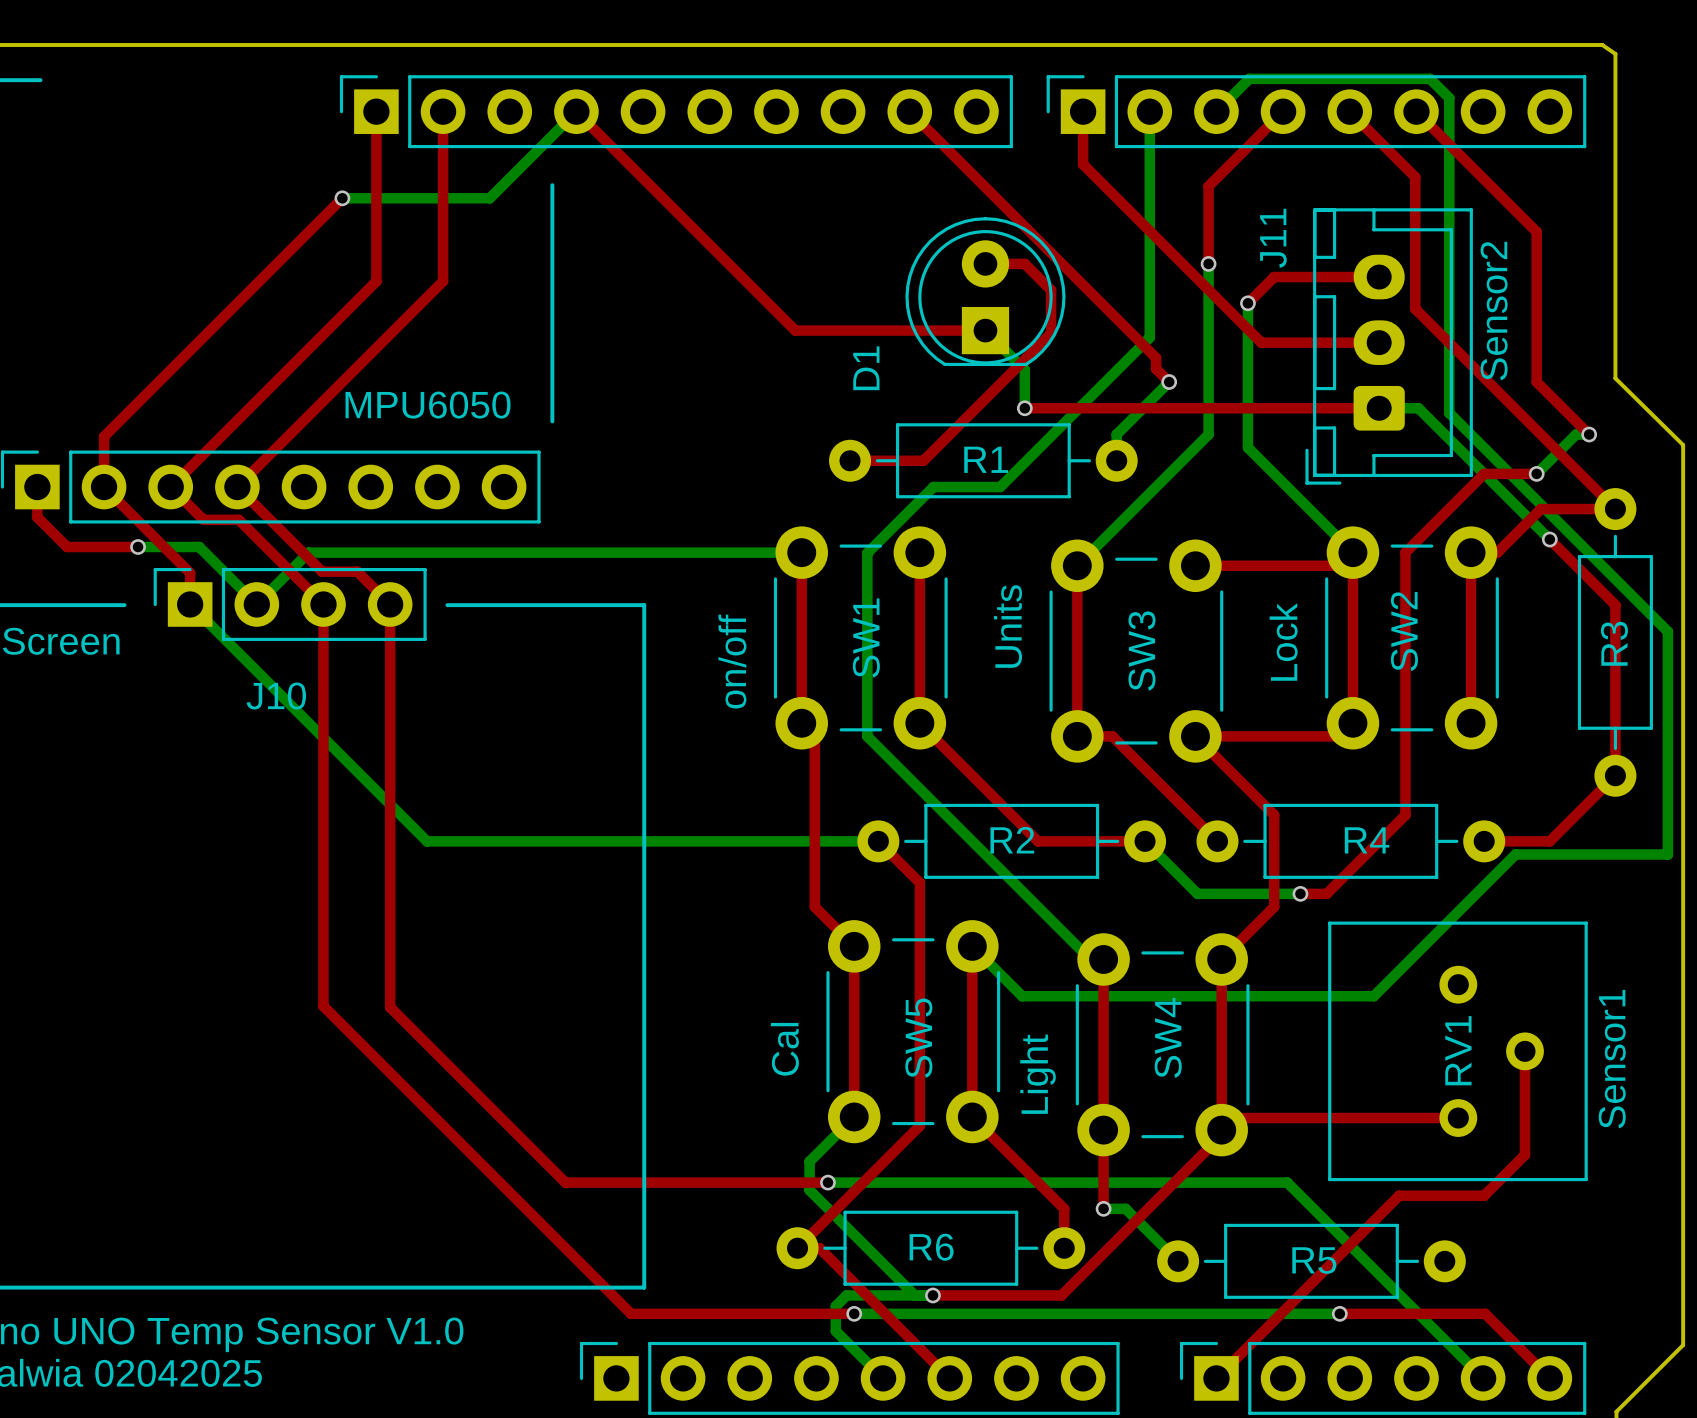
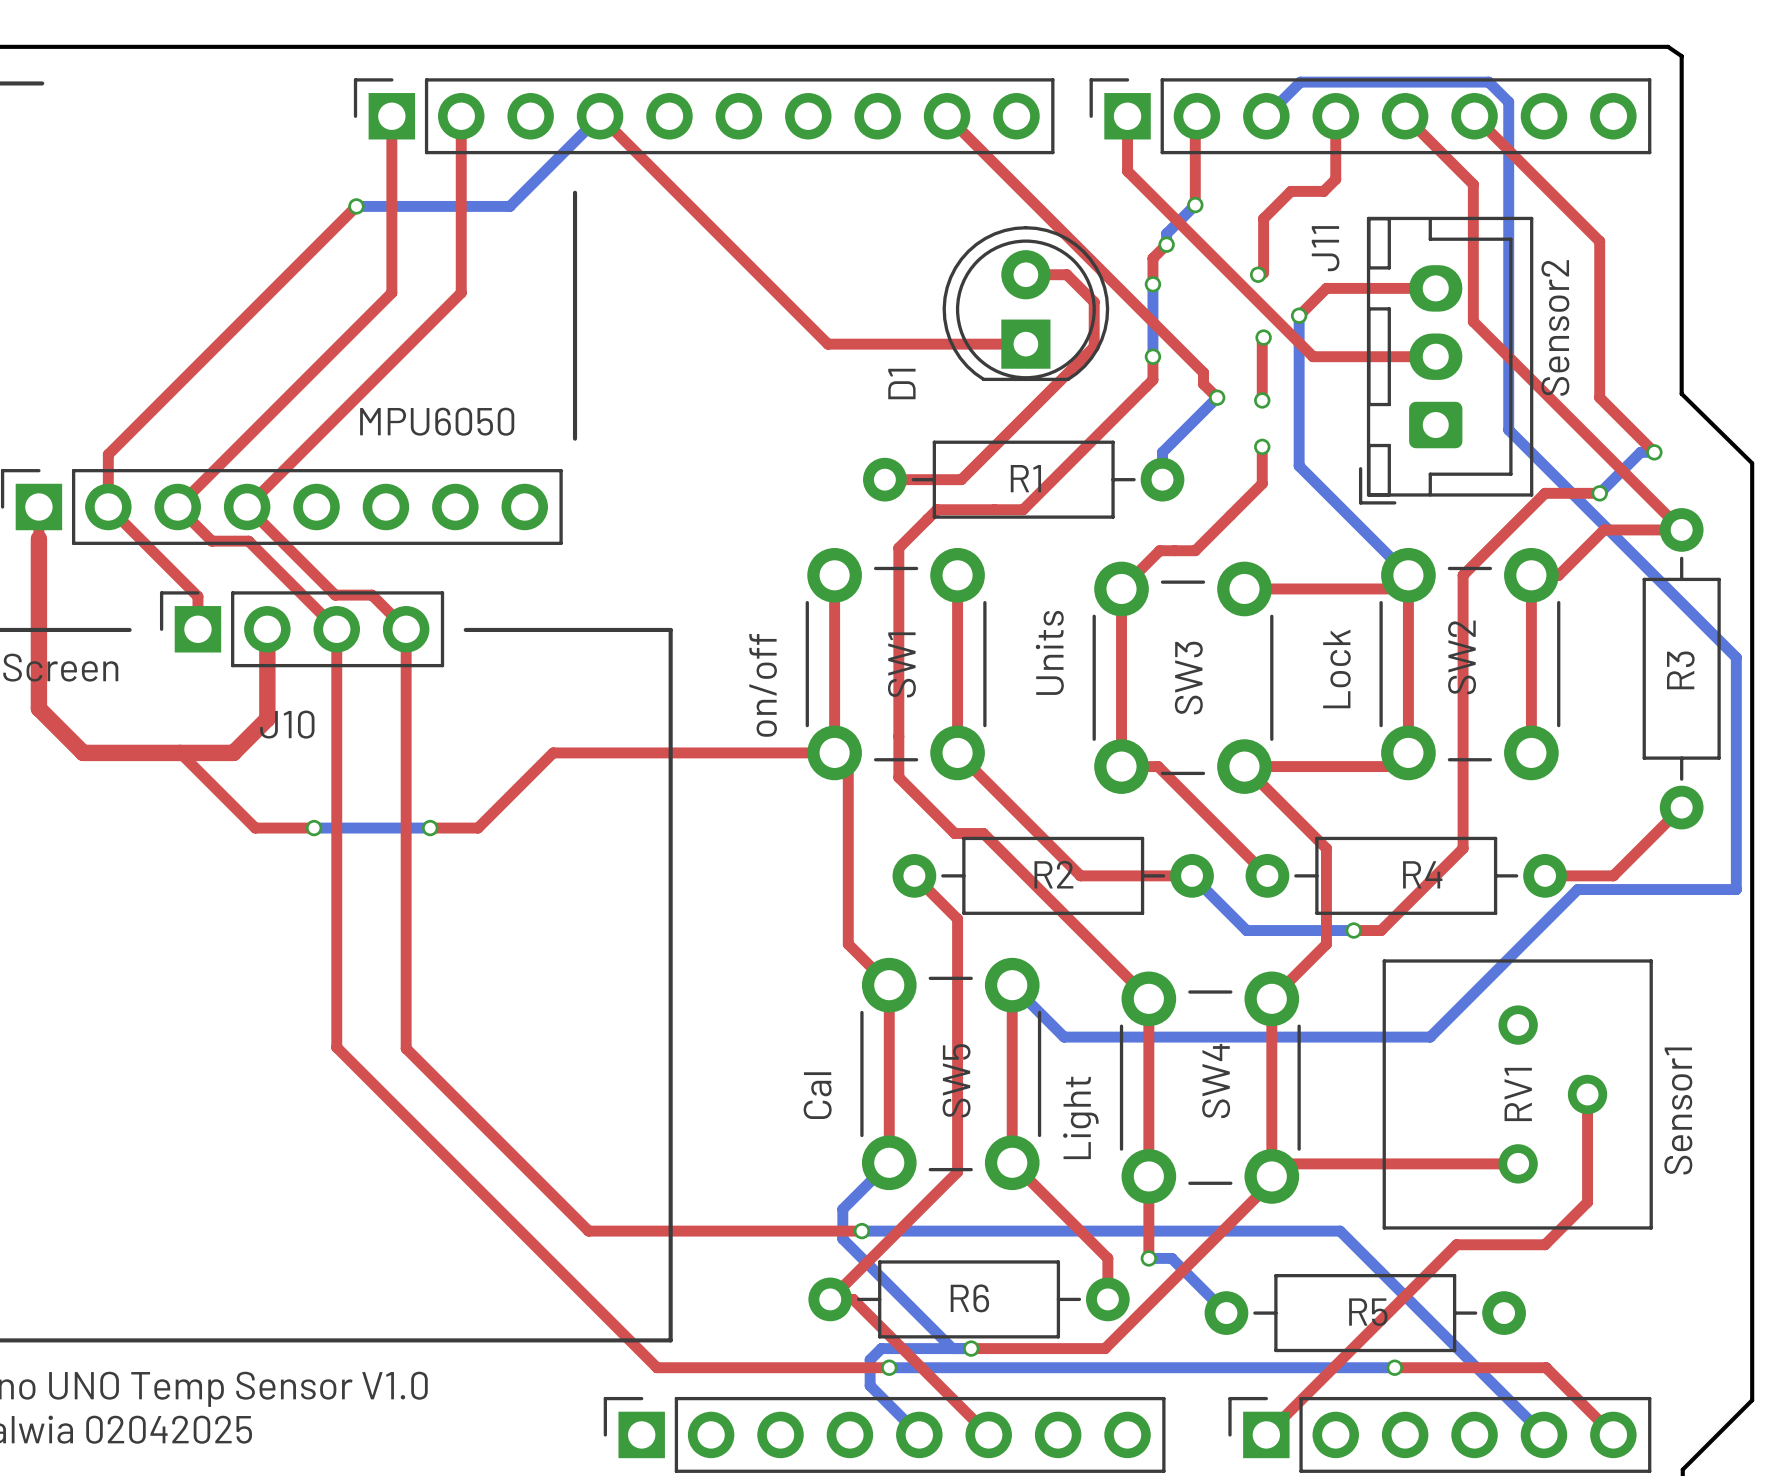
top track: none -> (1196, 116) (1195, 117) (1195, 205)
bottom track: (1149, 111) (1149, 337) (1000, 487) (933, 487) (867, 553) (867, 736) (1090, 959) (1103, 959) -> none
top track: (1283, 111) (1208, 186) (1208, 263) -> (1335, 116) (1335, 179) (1323, 191) (1290, 191) (1263, 218) (1263, 273)
bottom track: none -> (1195, 205) (1166, 233) (1166, 244)
via: none -> (1195, 205)
top track: none -> (1166, 244) (1152, 258) (1152, 284)
via: none -> (1166, 244)
bottom track: (1208, 263) (1208, 434) (1077, 565) -> none
bottom track: none -> (1152, 284) (1152, 356)
via: none -> (1152, 284)
top track: none -> (1263, 337) (1262, 400)
via: none -> (1263, 337)
bottom track: (985, 330) (1024, 369) (1024, 408) -> none
top track: none -> (1152, 356) (1152, 379) (1023, 509) (937, 509) (898, 547) (898, 777) (954, 833) (983, 833) (1148, 998)
via: none -> (1152, 356)
via: none -> (1262, 400)
top track: (1024, 408) (1379, 408) -> none
via: (1024, 408) -> none
bottom track: (1379, 408) (1418, 408) (1549, 539) -> none
top track: none -> (1262, 446) (1262, 483) (1195, 550) (1159, 550) (1121, 588)
via: none -> (1262, 446)
top track: (37, 517) (67, 547) (138, 547) -> (38, 538) (38, 708) (83, 752) (233, 752) (267, 719) (267, 629)
top track: (1549, 539) (1615, 605) (1615, 775) -> none
via: (1549, 539) -> none
bottom track: (138, 547) (199, 547) (256, 604) (308, 552) (801, 552) -> none
via: (138, 547) -> none
bottom track: (190, 604) (427, 841) (878, 841) -> none
top track: none -> (180, 752) (255, 828) (314, 828)
top track: none -> (834, 752) (553, 752) (478, 828) (430, 828)
bottom track: none -> (314, 828) (430, 828)
via: none -> (314, 828)
via: none -> (430, 828)

